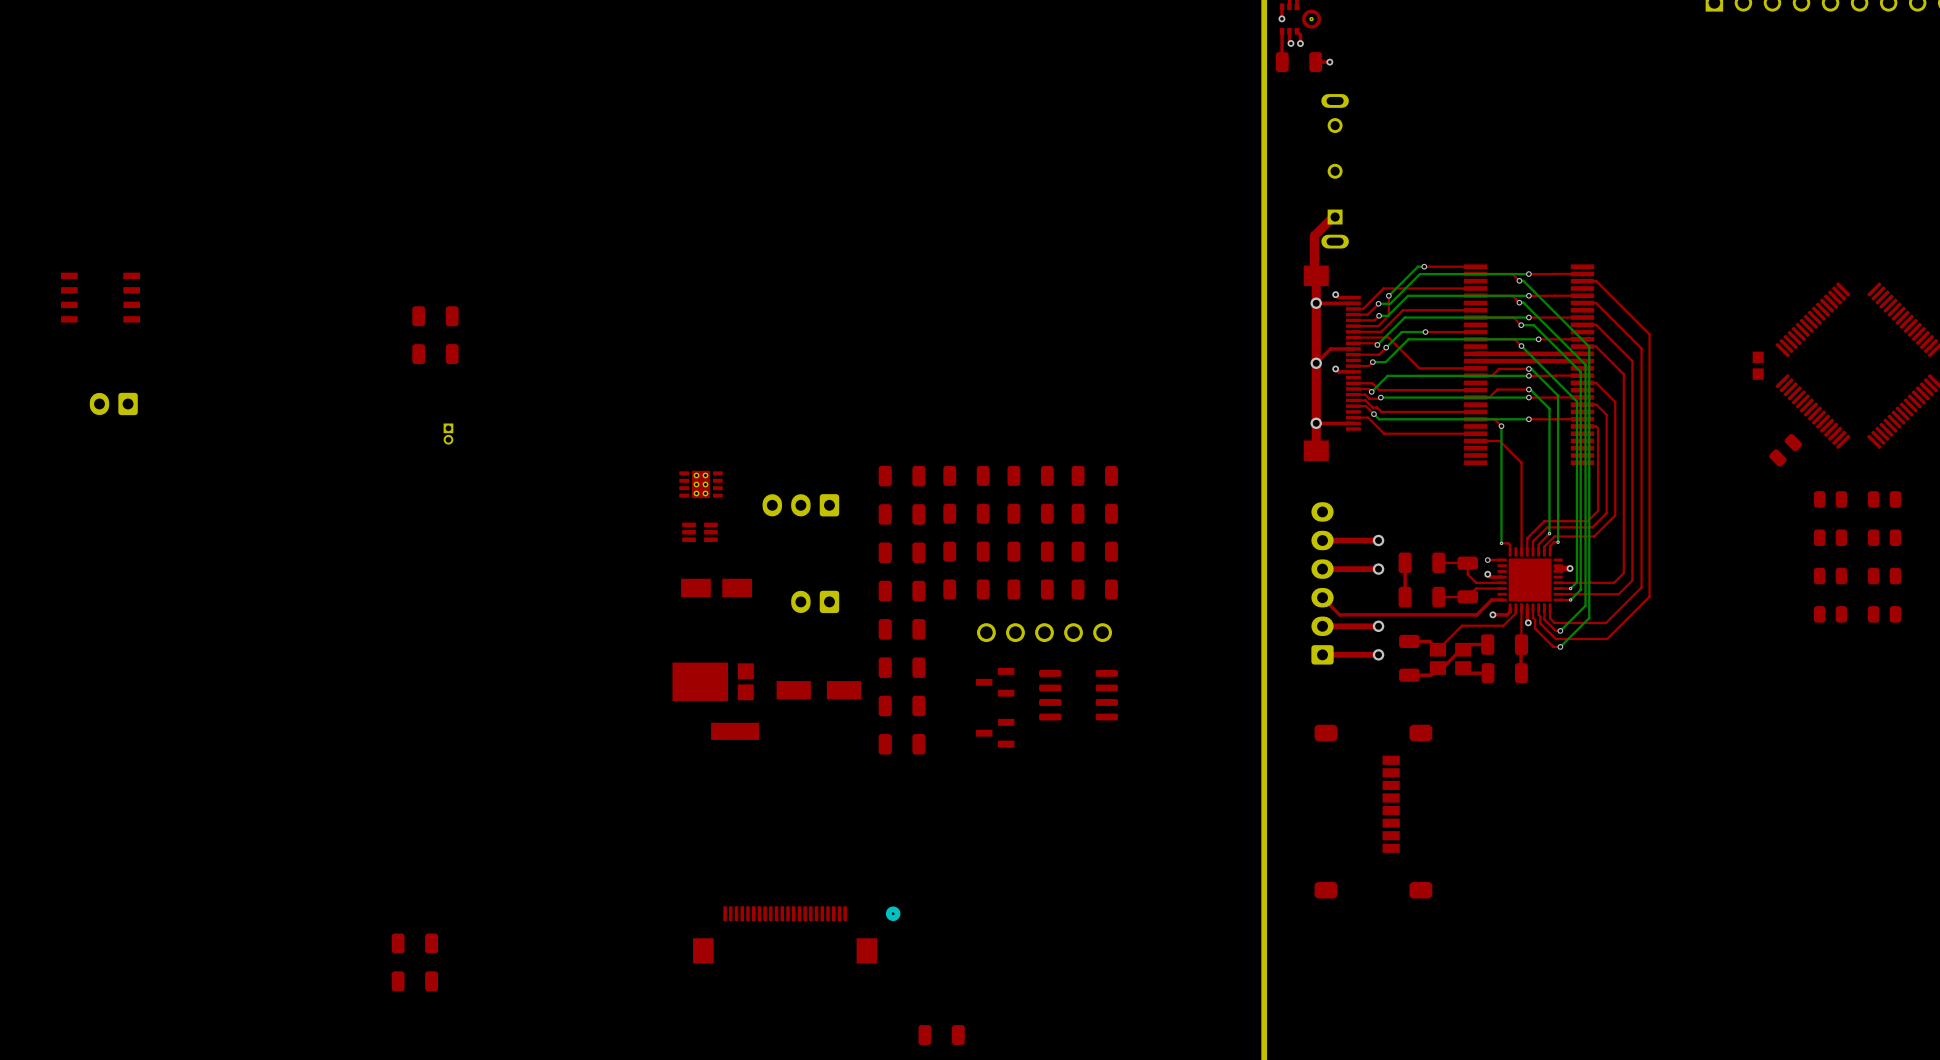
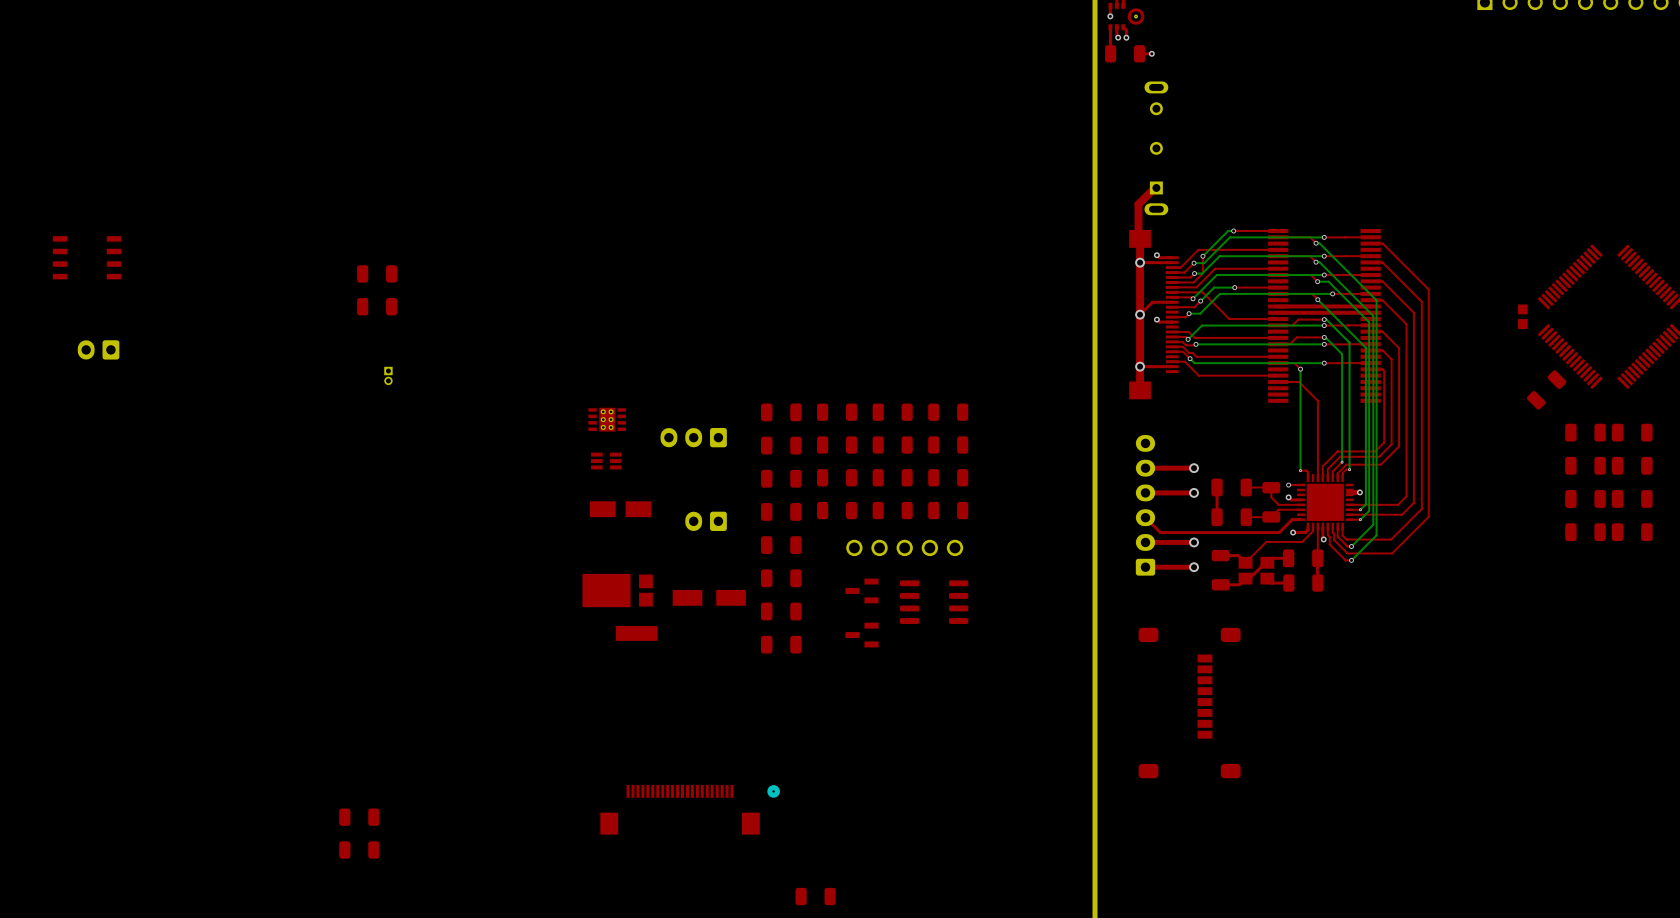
part footprint: [1769, 433, 1803, 467] -> [1526, 370, 1567, 410]
part footprint: [1813, 491, 1848, 508] -> [1565, 423, 1606, 442]
part footprint: [1867, 491, 1902, 508] -> [1611, 423, 1653, 442]
part footprint: [1813, 529, 1848, 547] -> [1565, 456, 1606, 475]
part footprint: [1867, 529, 1902, 547] -> [1611, 456, 1653, 475]
part footprint: [1813, 567, 1848, 585] -> [1565, 490, 1606, 508]
part footprint: [1867, 567, 1902, 585] -> [1611, 490, 1653, 508]
part footprint: [1813, 606, 1848, 623] -> [1565, 523, 1606, 542]
part footprint: [1867, 606, 1902, 623] -> [1611, 523, 1653, 542]

